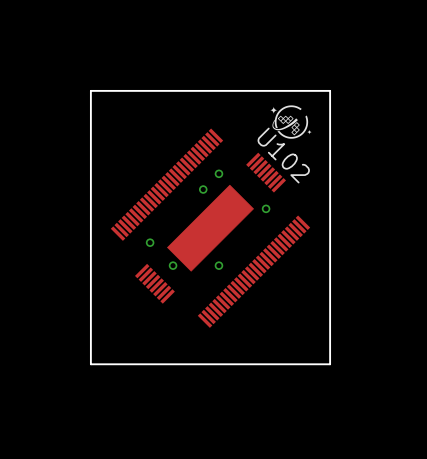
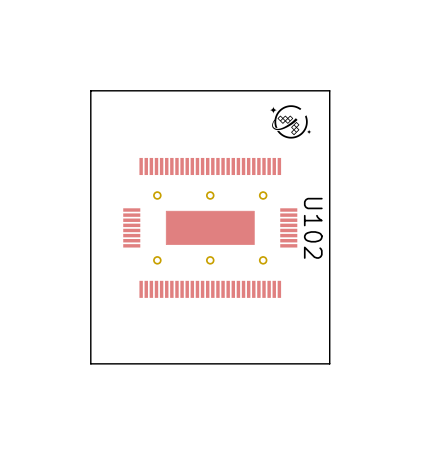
U102 footprint: [110, 128, 311, 328] -> [123, 157, 298, 298]
U102 name position: U102 (283, 155) -> U102 (313, 228)

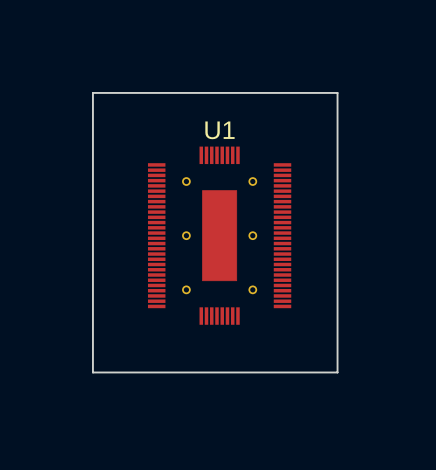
drawing: [269, 105, 312, 139] -> none
U102: (210, 227) -> none
U1: none -> (219, 235)

